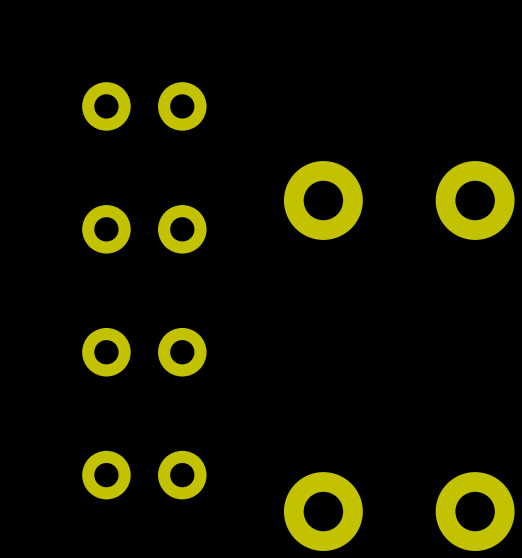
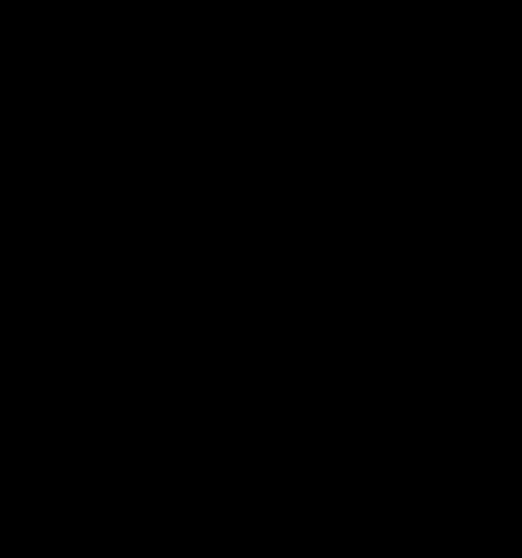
part: (144, 106) -> none
part: (399, 200) -> none
part: (144, 229) -> none
part: (144, 352) -> none
part: (144, 475) -> none
part: (399, 511) -> none

